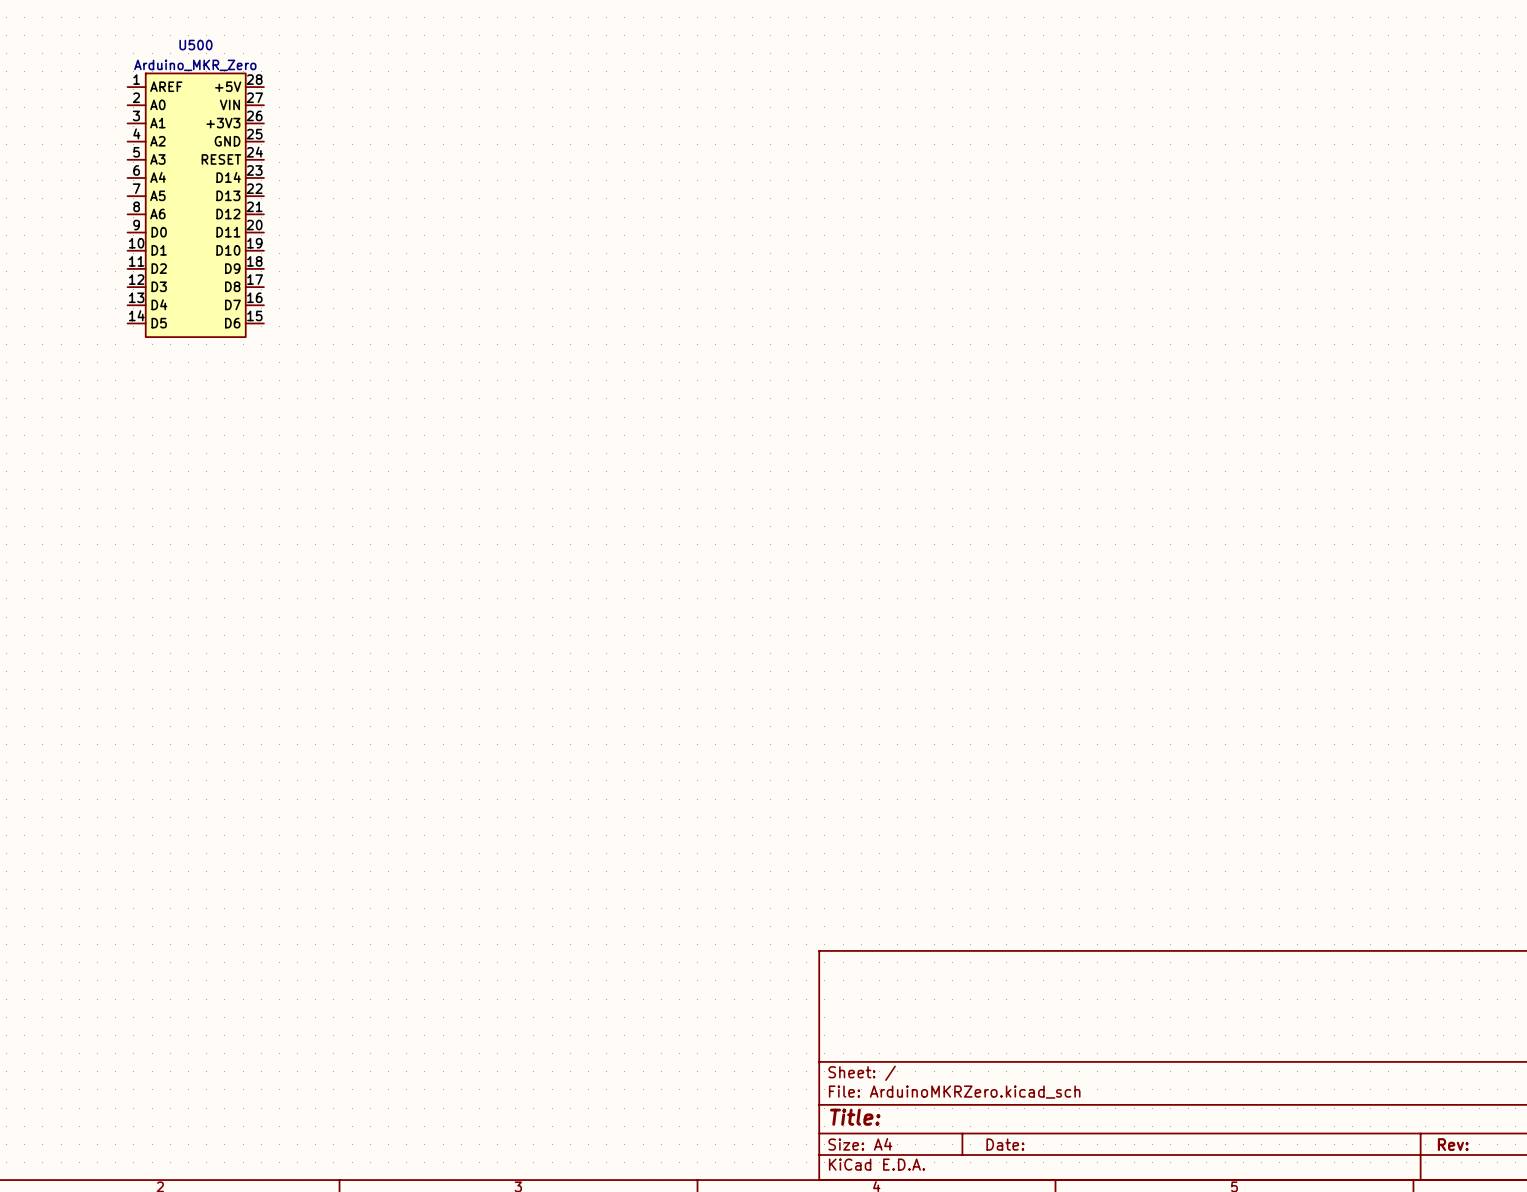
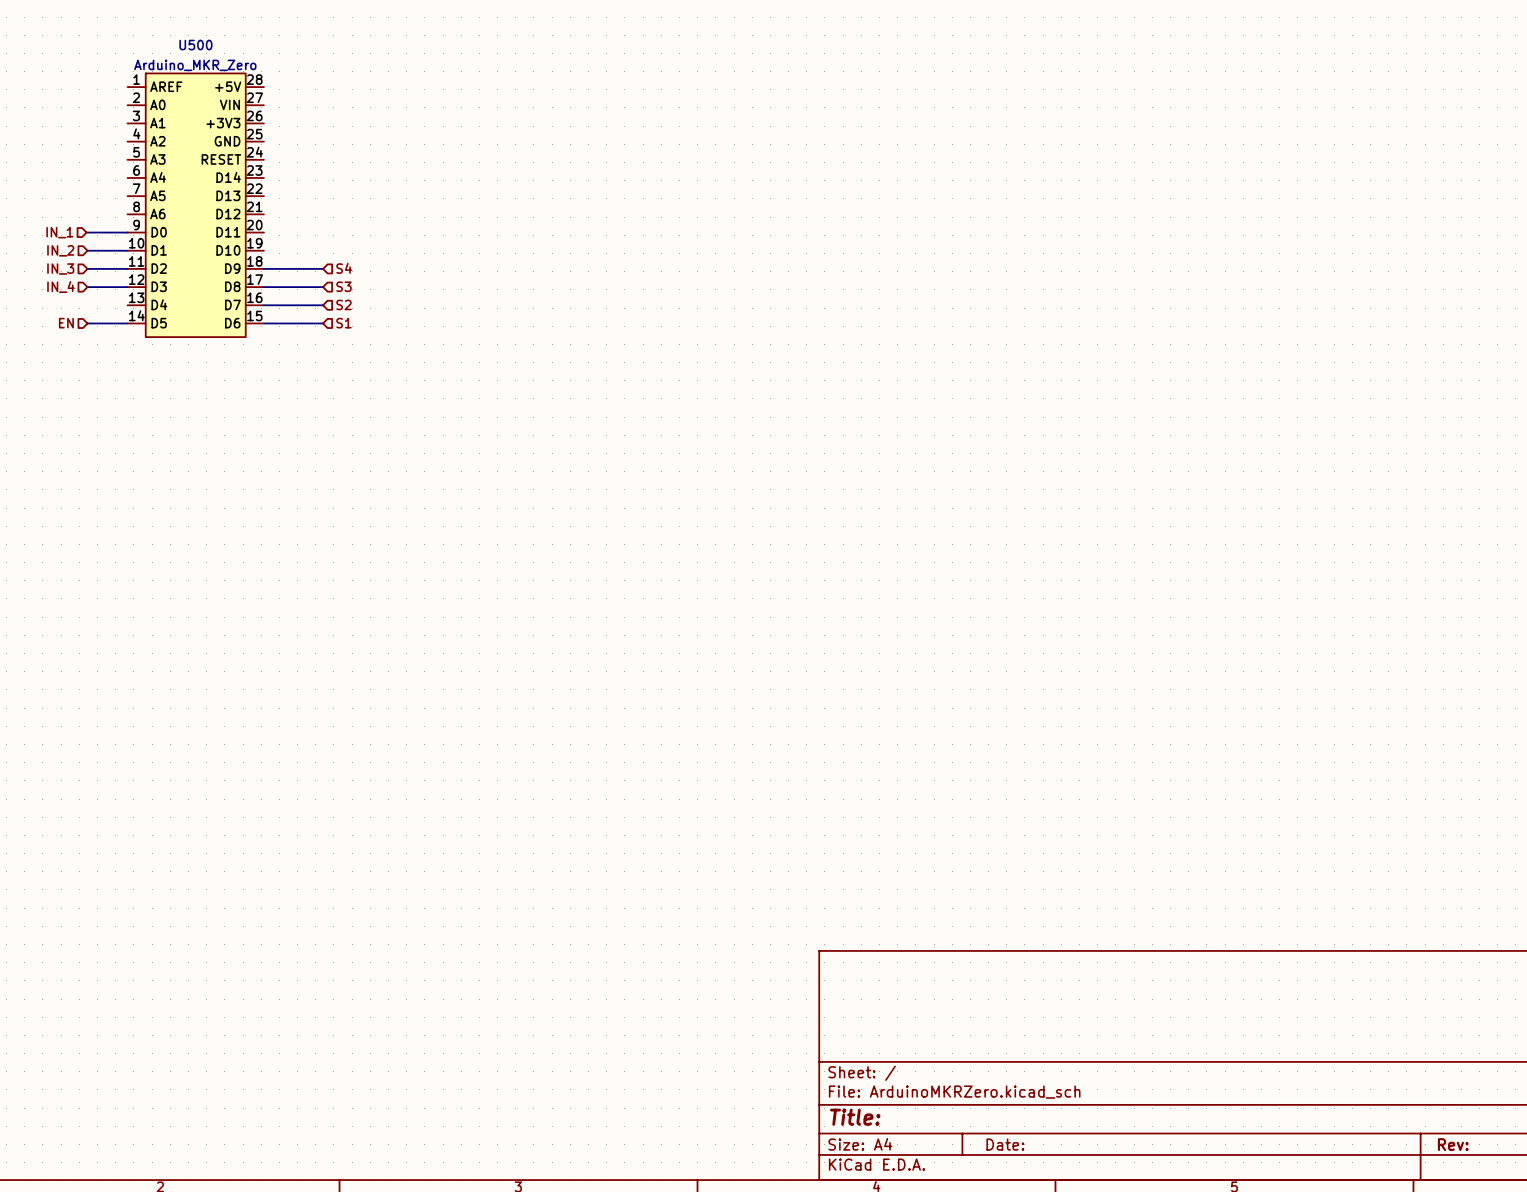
hierarchical label: none -> IN_1 (59, 232)
wire: none -> (86, 232) (127, 232)
hierarchical label: none -> IN_2 (60, 250)
wire: none -> (87, 250) (127, 250)
wire: none -> (87, 268) (127, 268)
wire: none -> (263, 268) (323, 268)
hierarchical label: none -> S4 (344, 268)
hierarchical label: none -> IN_3 (60, 269)
hierarchical label: none -> IN_4 (60, 286)
hierarchical label: none -> S3 (343, 286)
wire: none -> (87, 287) (127, 287)
wire: none -> (263, 287) (323, 287)
hierarchical label: none -> S2 (343, 304)
wire: none -> (263, 305) (323, 305)
hierarchical label: none -> EN (66, 323)
wire: none -> (87, 323) (127, 323)
wire: none -> (263, 323) (323, 323)
hierarchical label: none -> S1 (343, 323)

